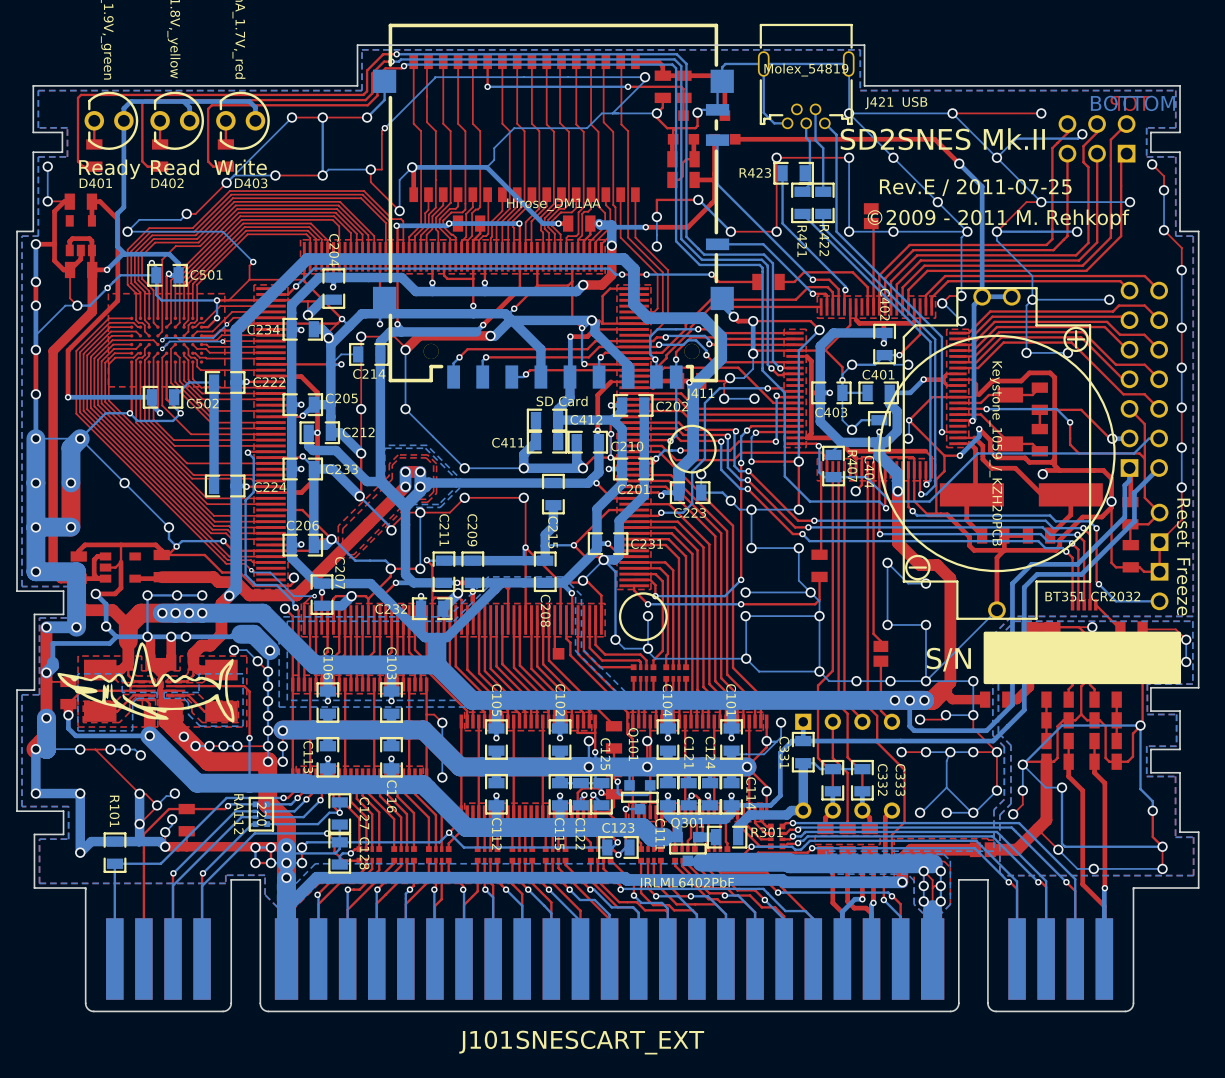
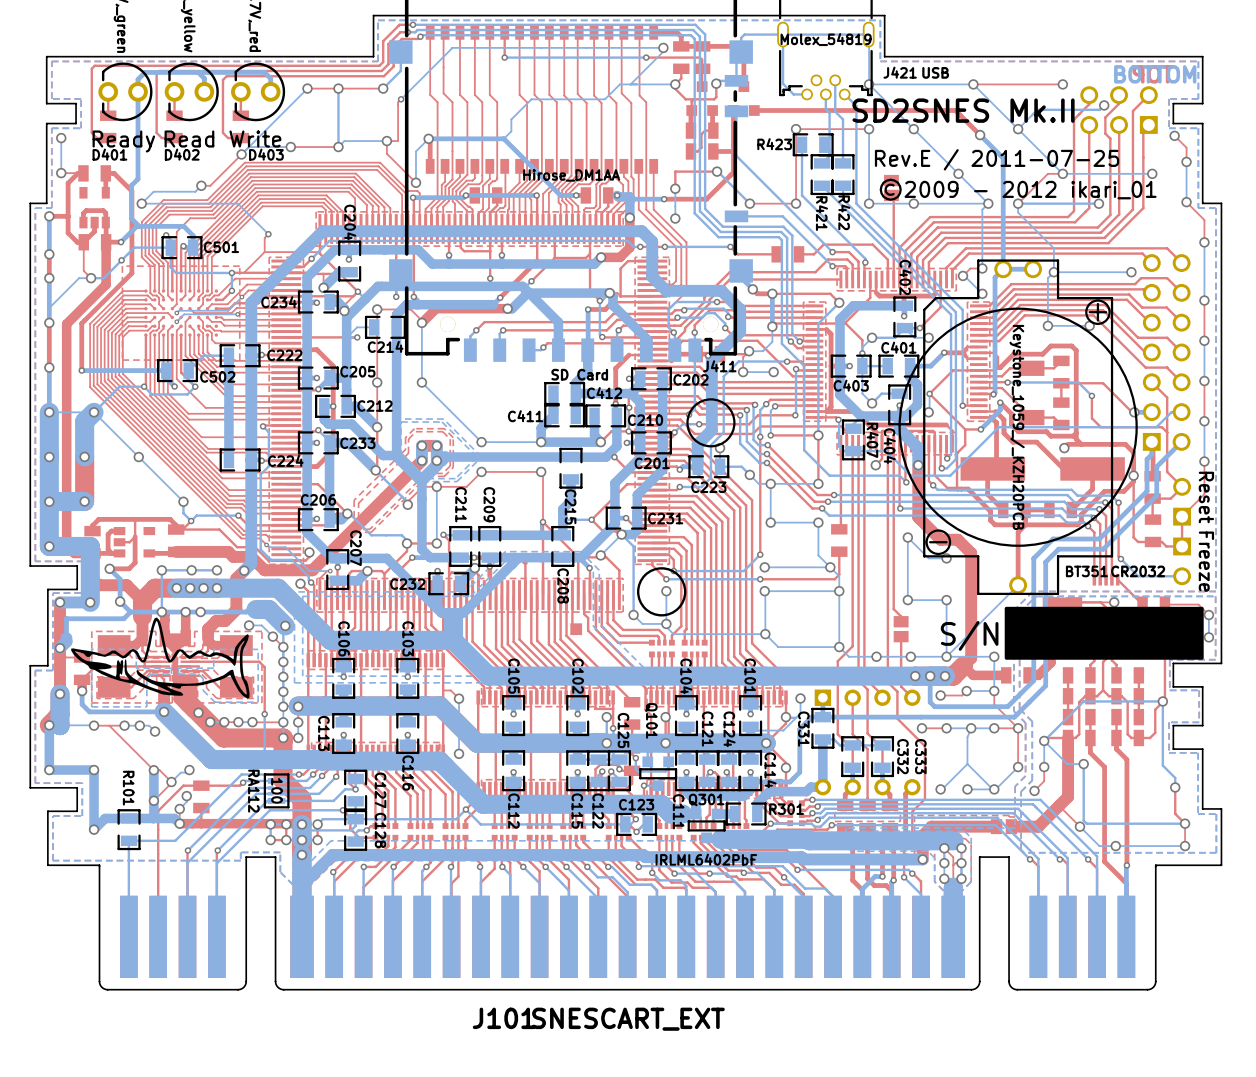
text: ©2009 - 2011 M. Rehkopf (998, 219) -> ©2009 - 2012 ikari_01 (1018, 189)
RA112 value: 220 (261, 814) -> 100 (276, 790)

